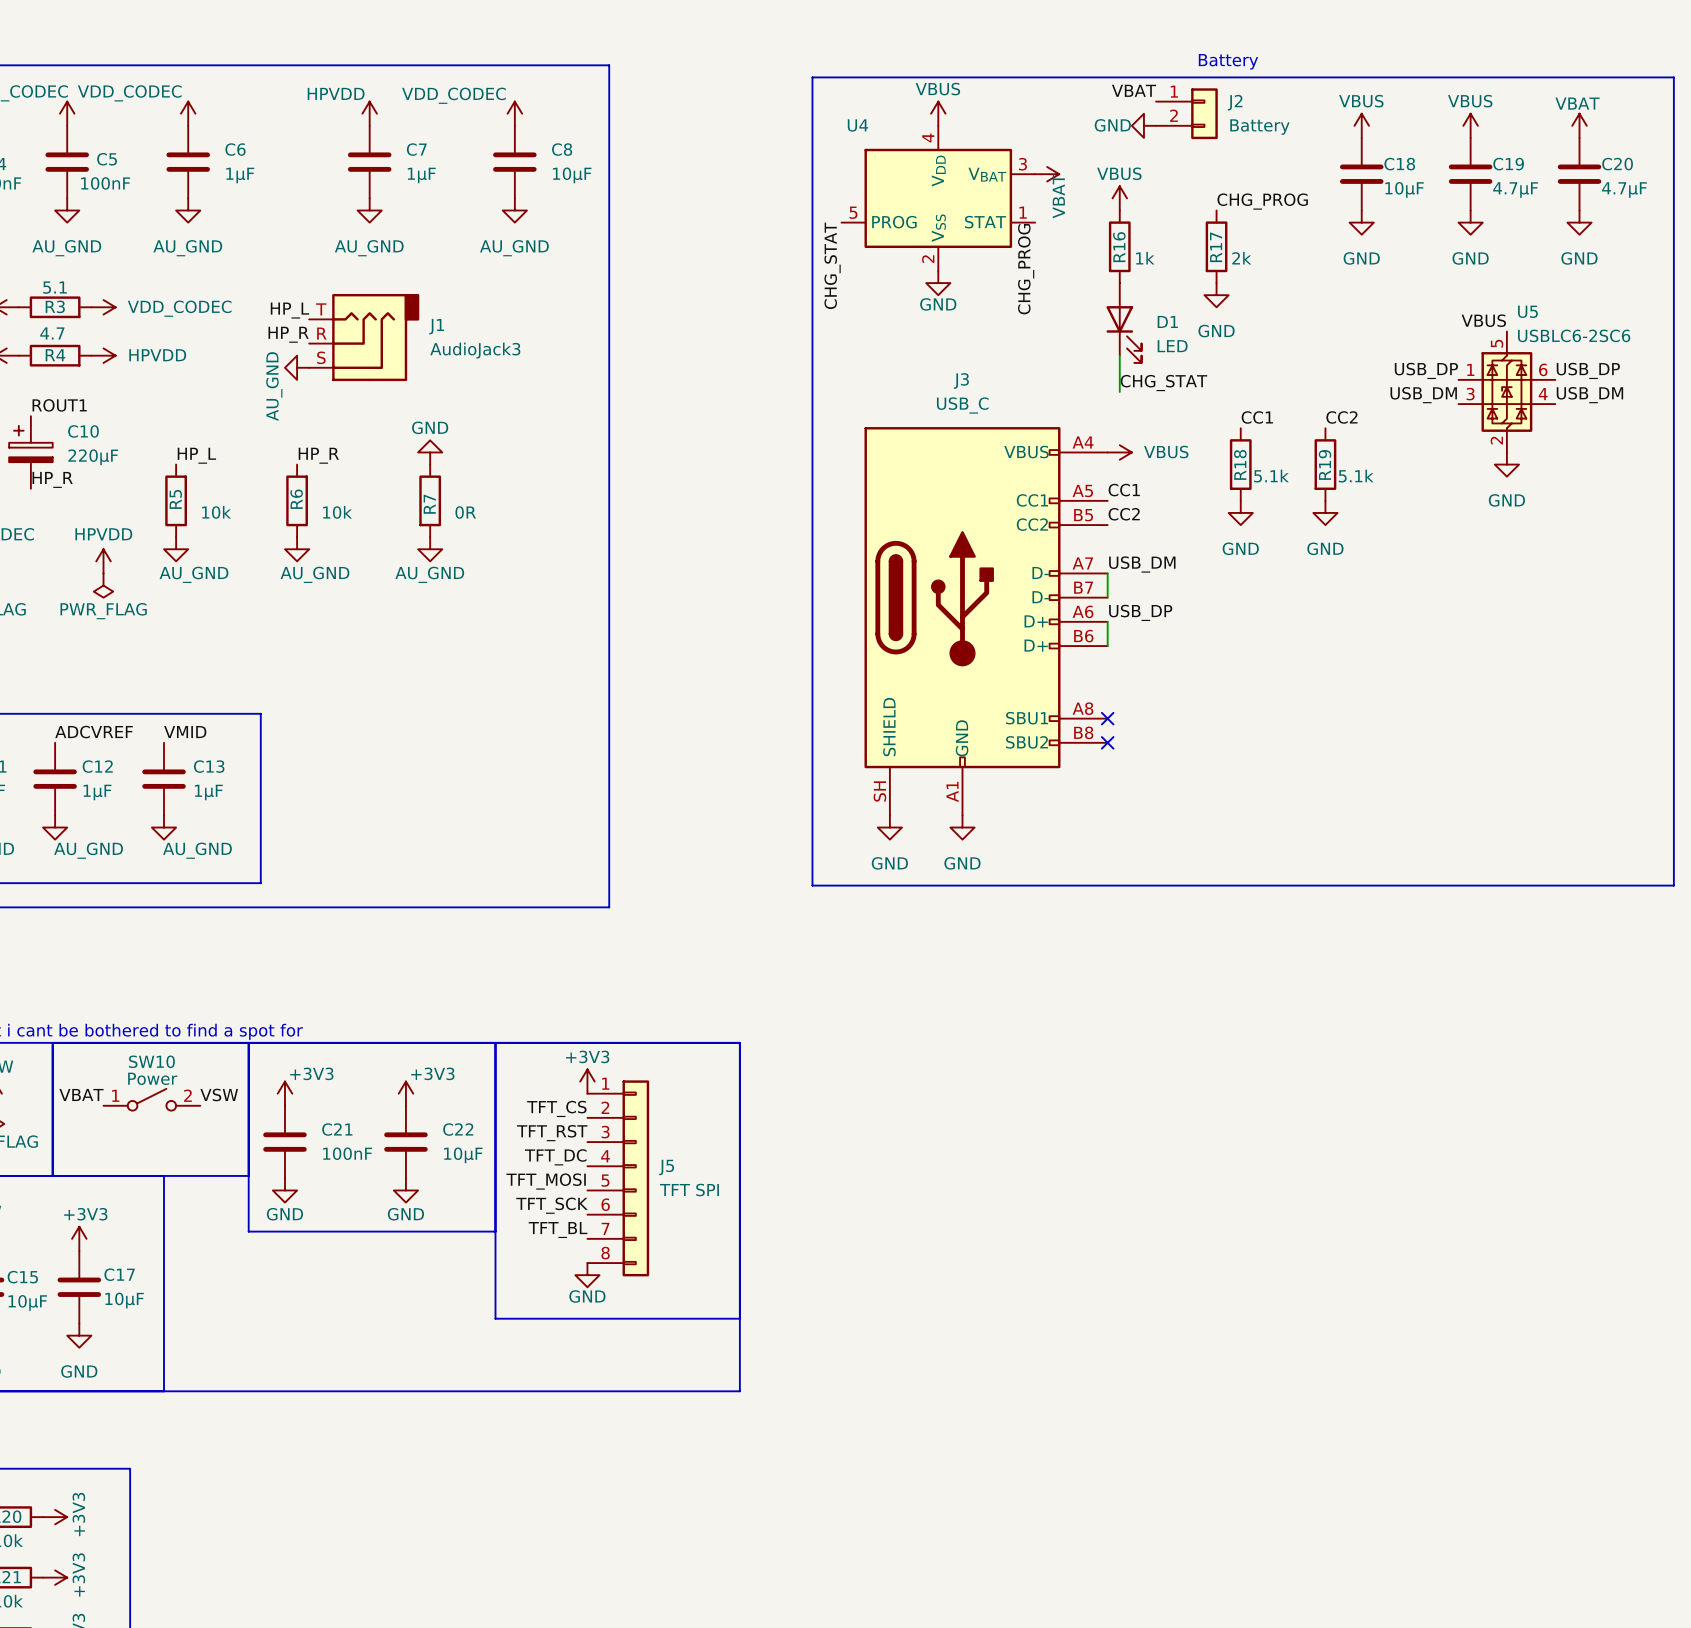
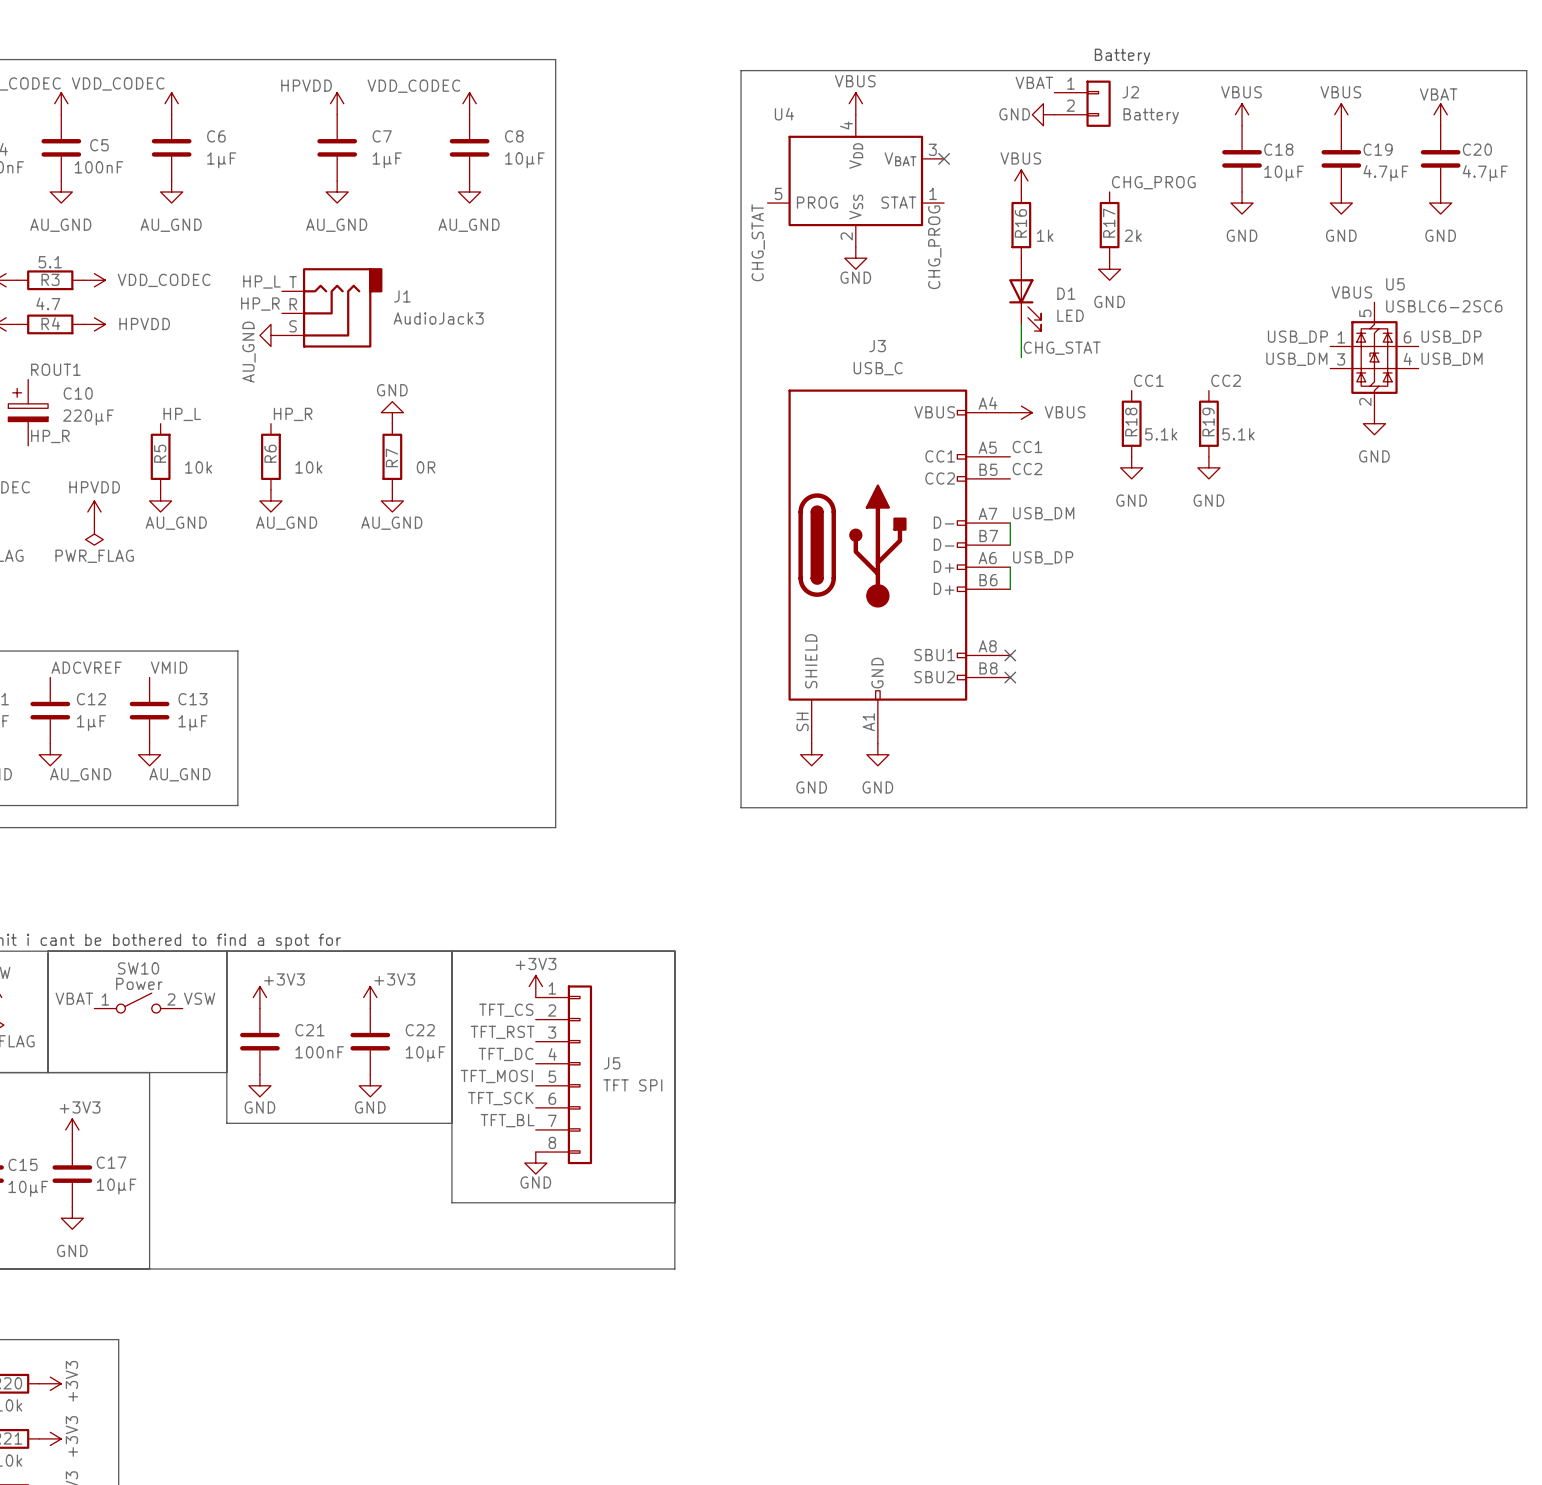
no-connect mark: none -> (944, 158)
power symbol: VBAT (1047, 174) -> none

